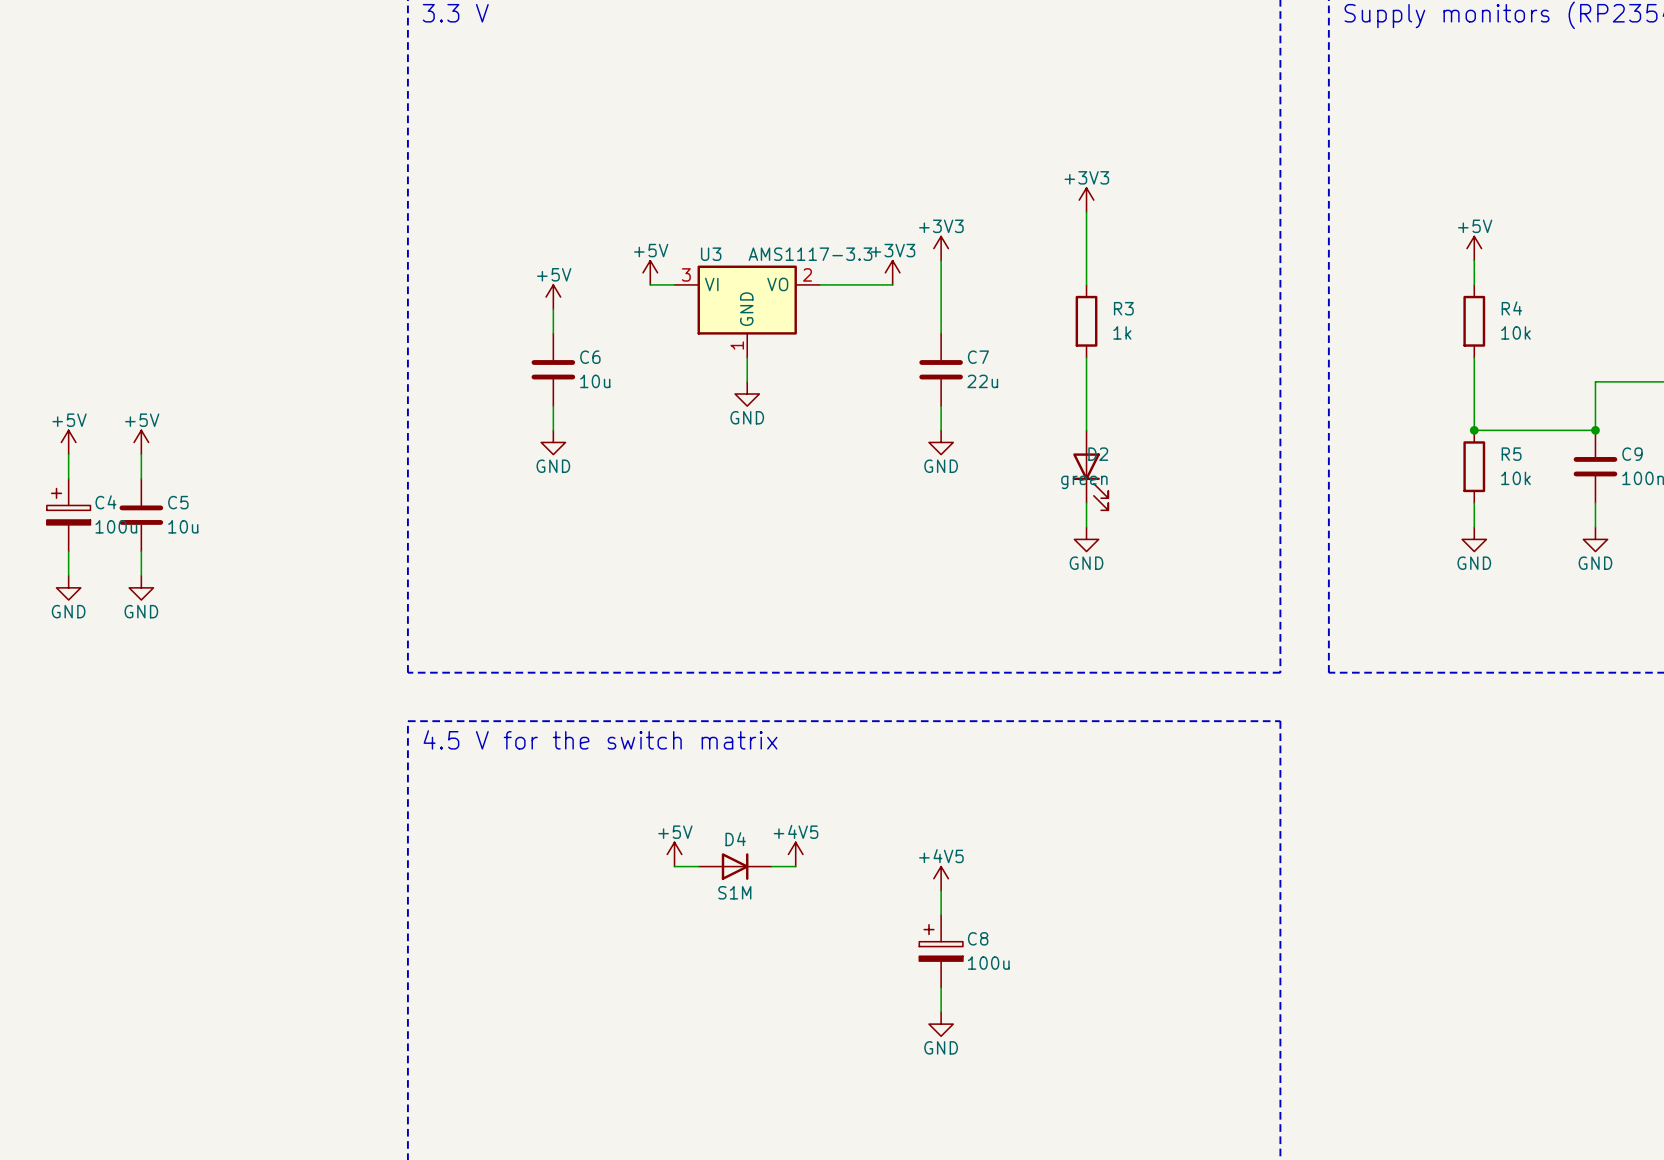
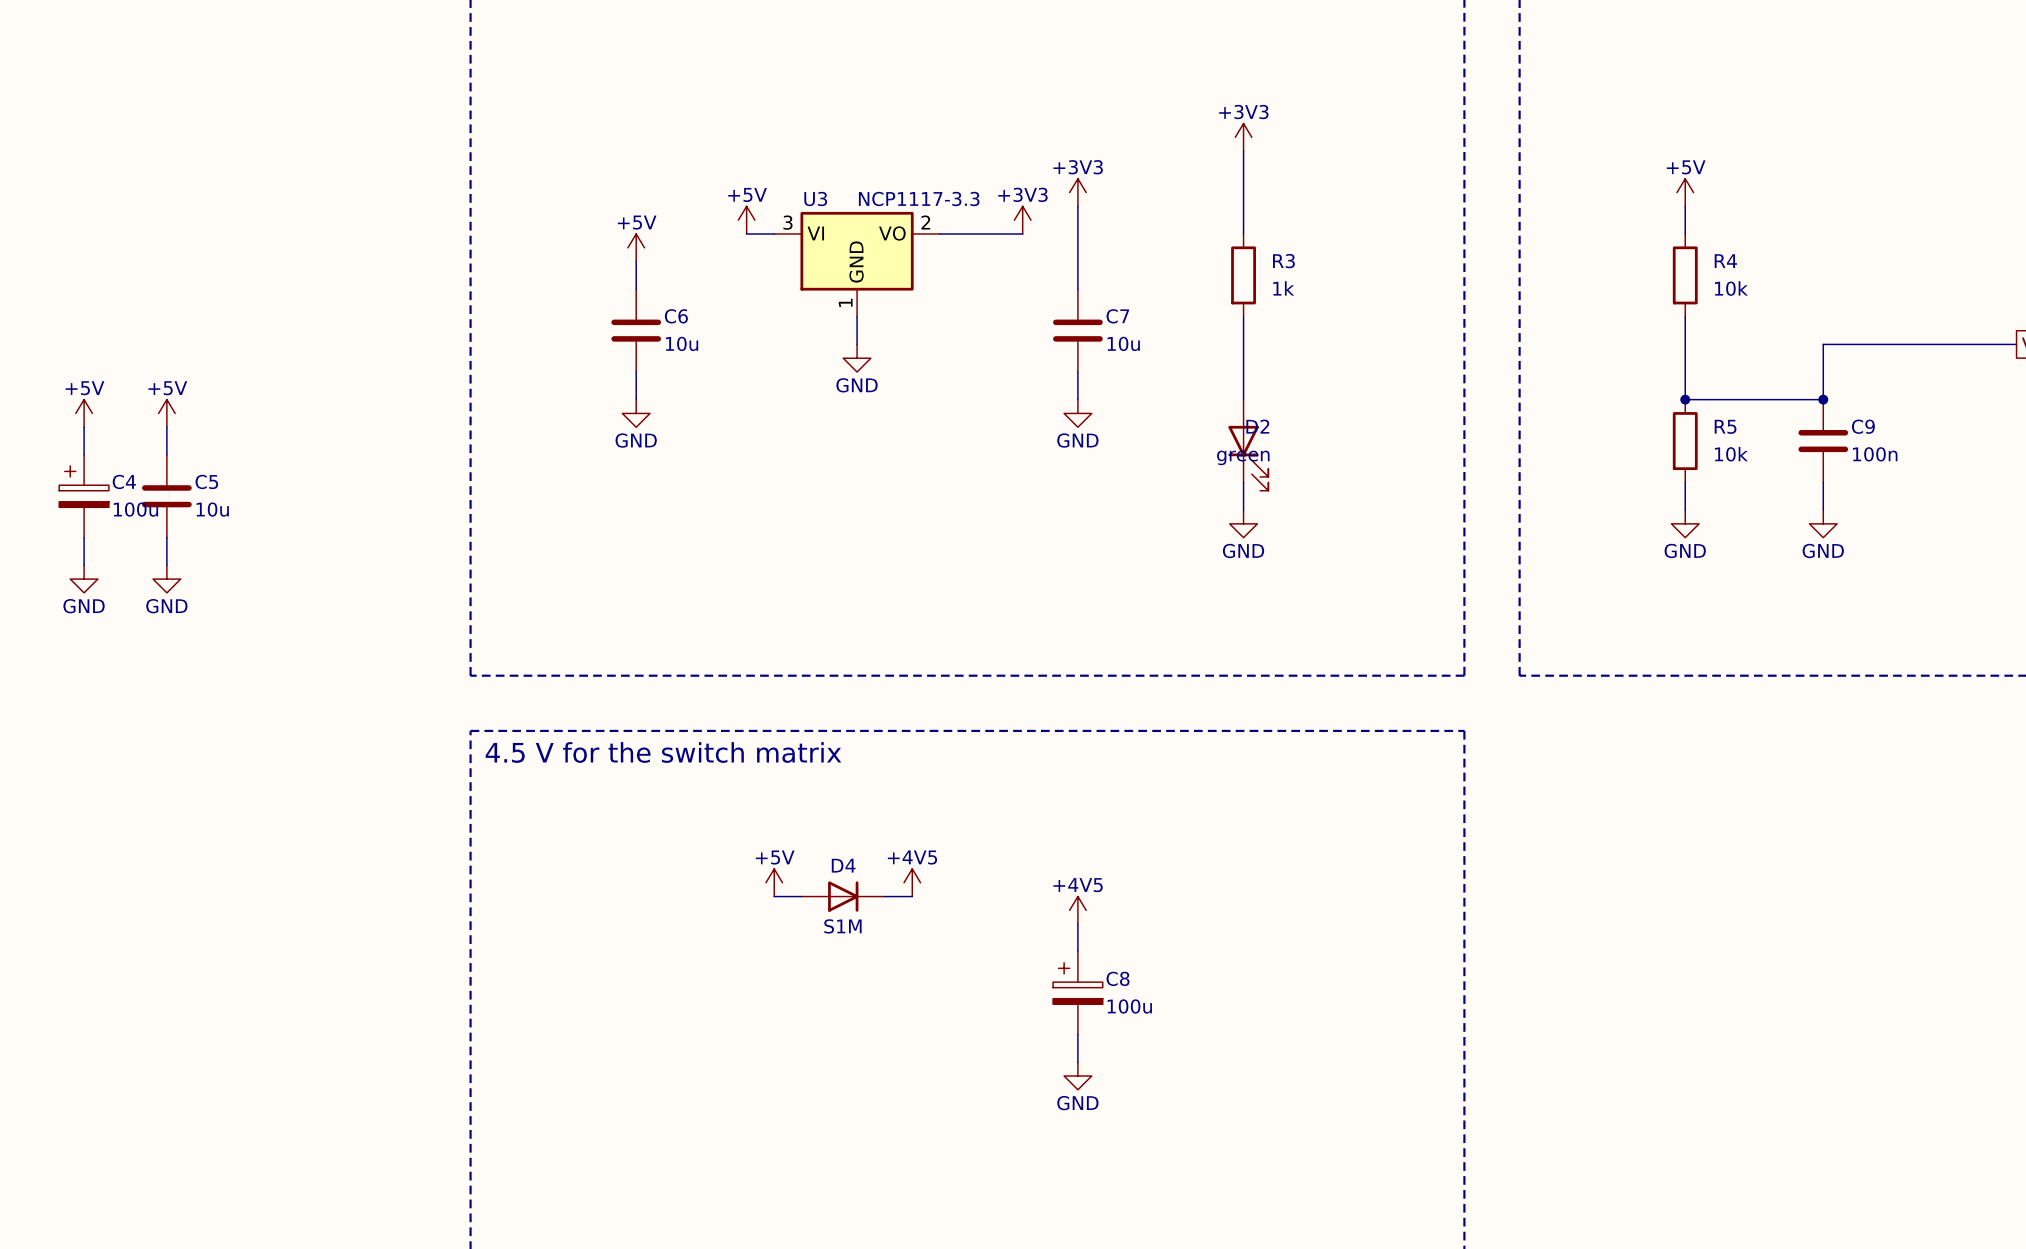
U3 value: AMS1117-3.3 (810, 254) -> NCP1117-3.3 (919, 198)
C7 value: 22u (982, 381) -> 10u (1123, 343)

